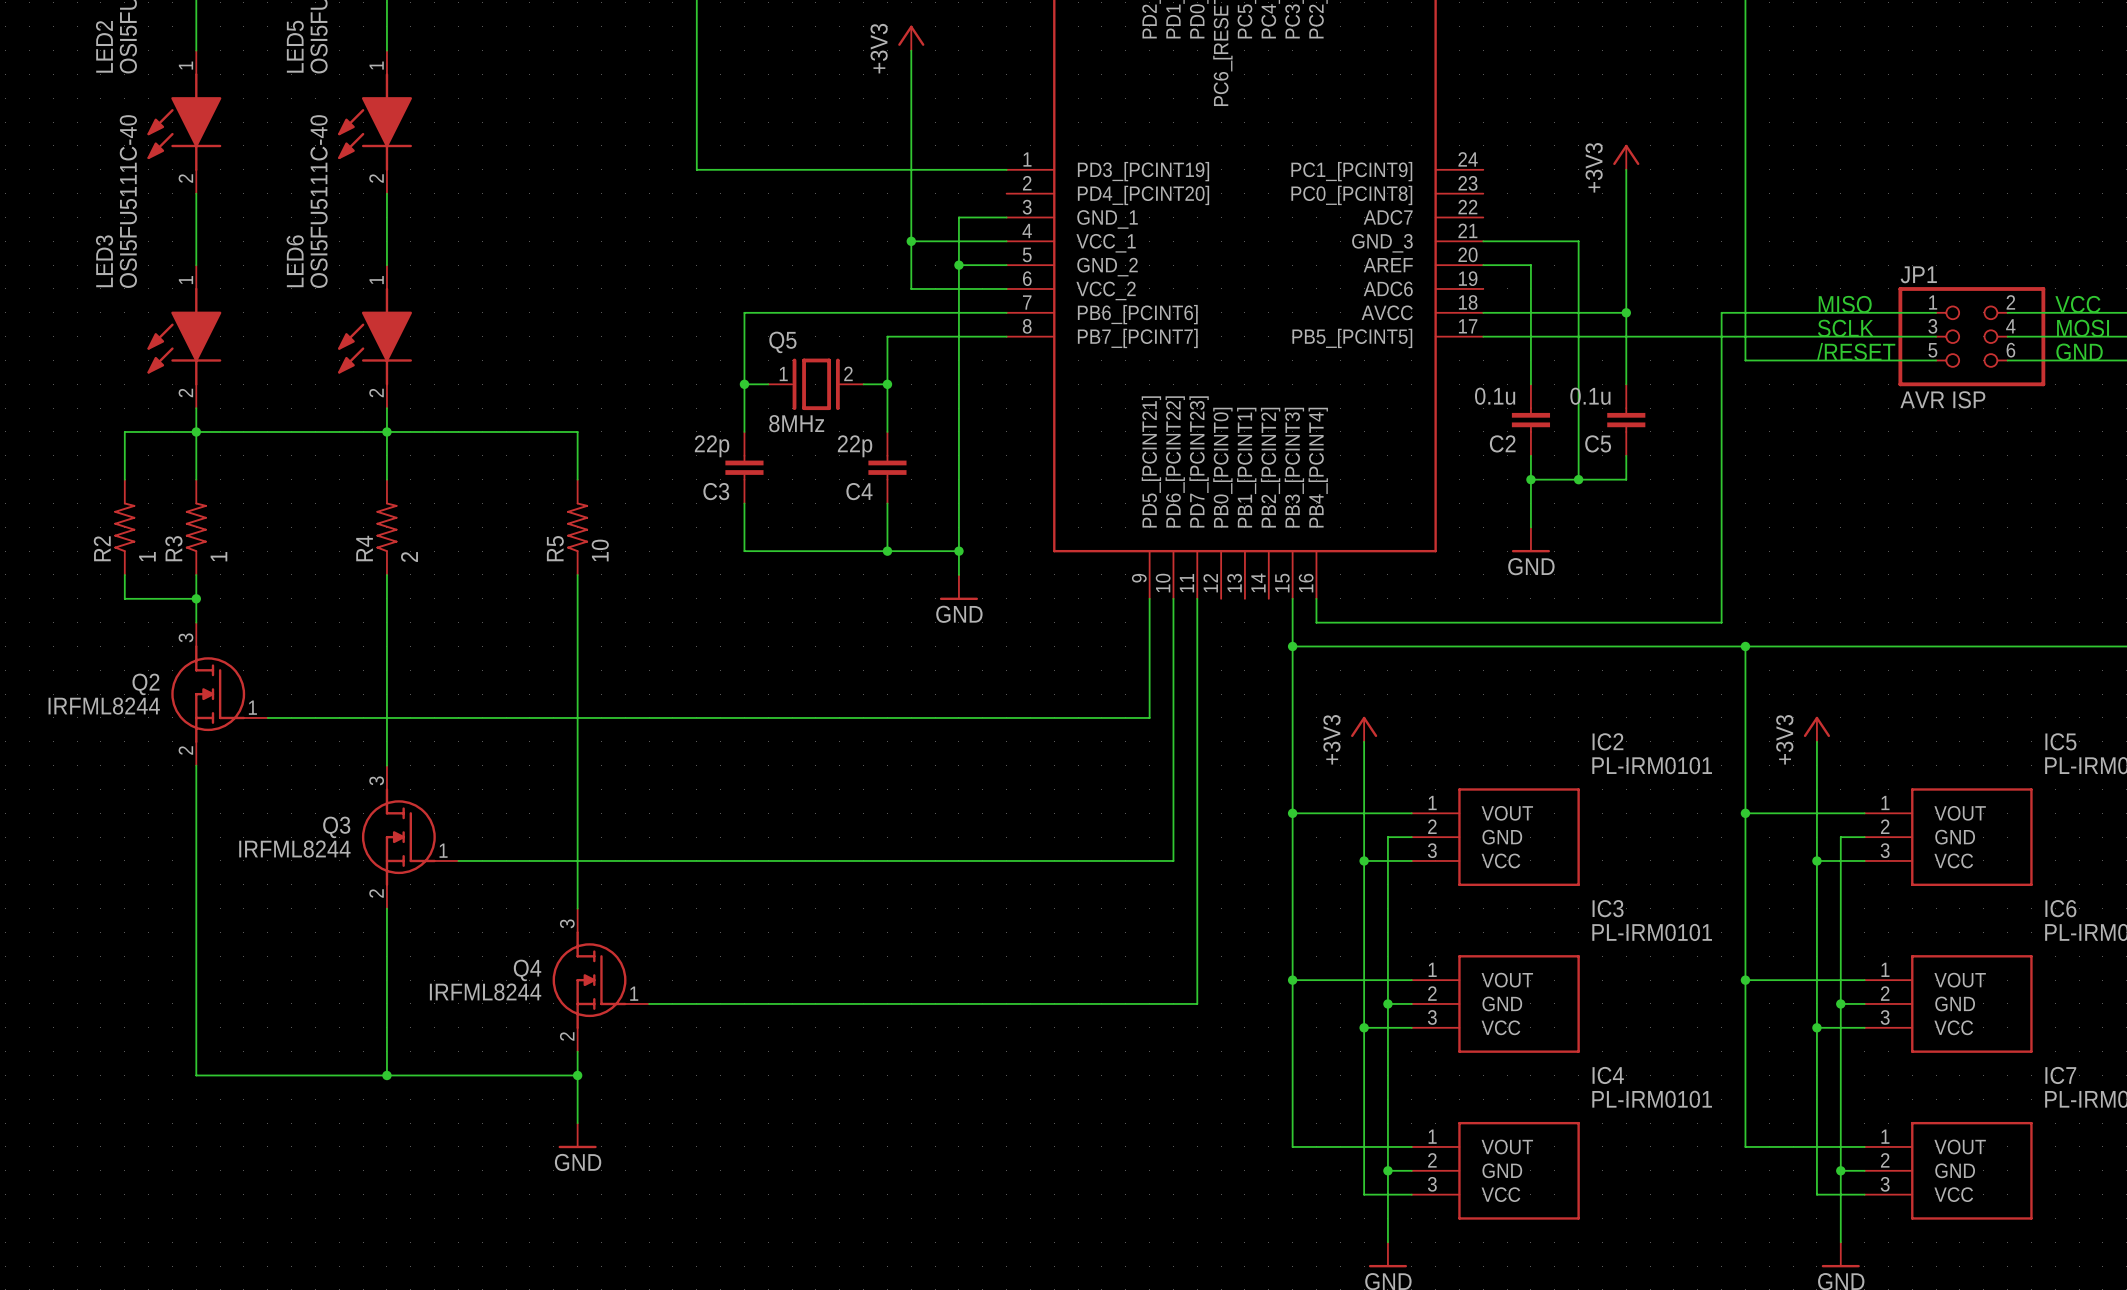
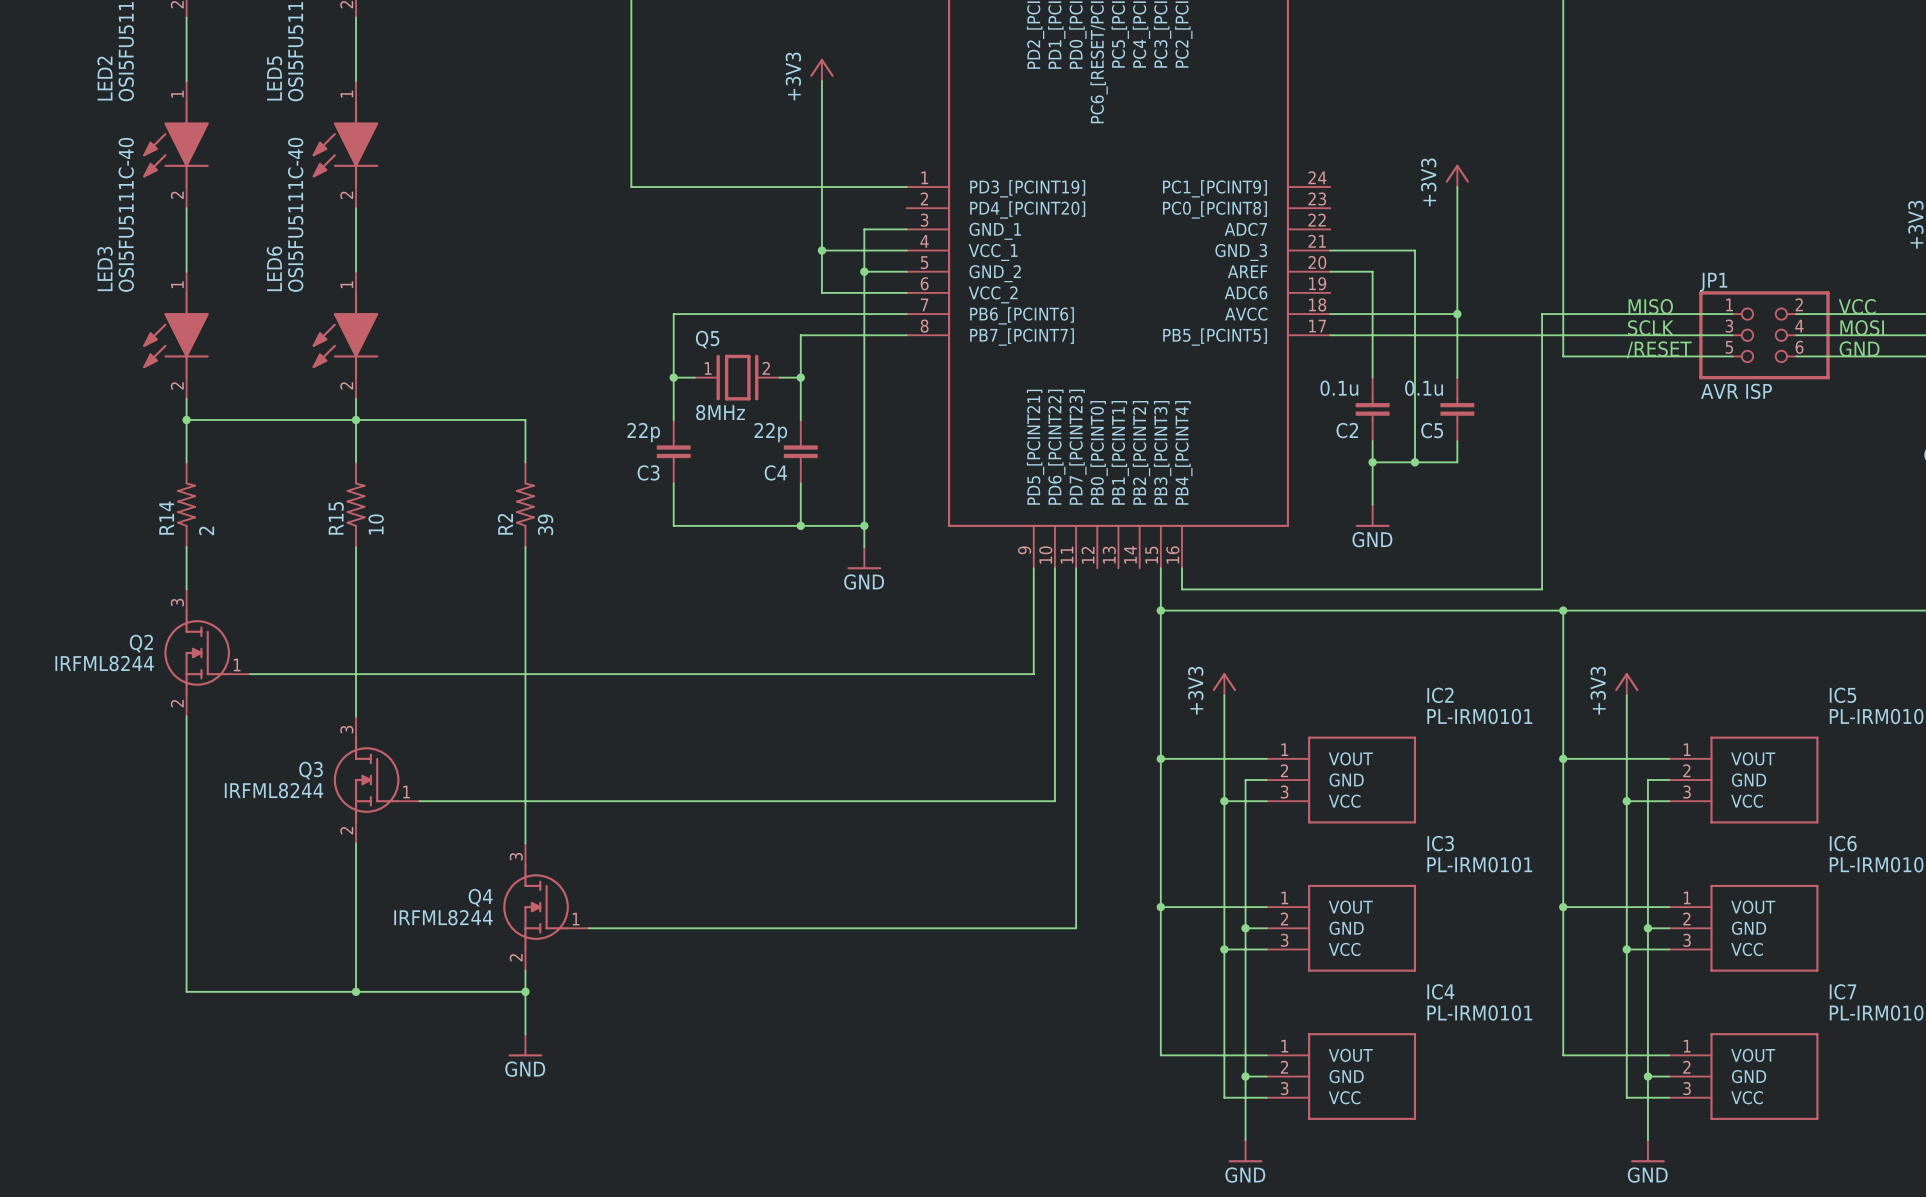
wire: (196, 431) (124, 431) (124, 479) -> none
R2: 1 (124, 527) -> none
R3 name: R3 (173, 548) -> R14 (166, 518)
R4 name: R4 (364, 548) -> R15 (336, 518)
R5 name: R5 (555, 548) -> R2 (505, 524)
R5 value: 10 (600, 550) -> 39 (545, 524)
R3 value: 1 (218, 556) -> 2 (206, 530)
R4 value: 2 (409, 557) -> 10 (376, 524)
wire: (124, 574) (124, 598) (196, 598) -> none
junction: (196, 598) -> none

